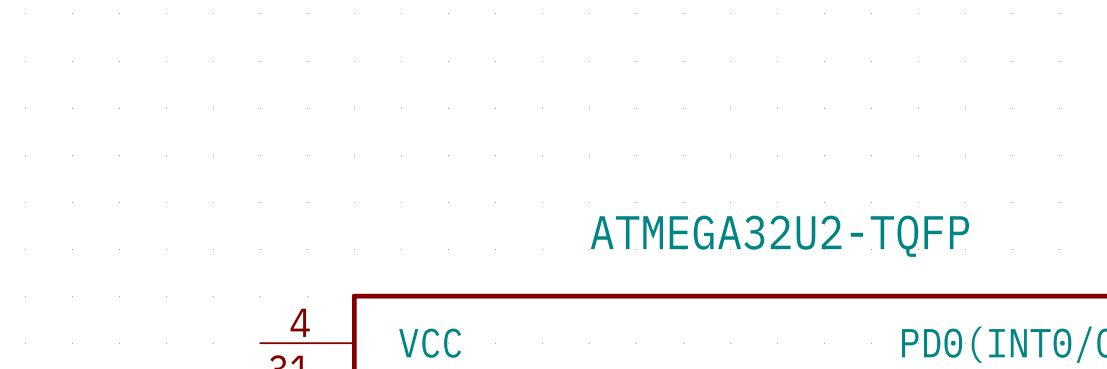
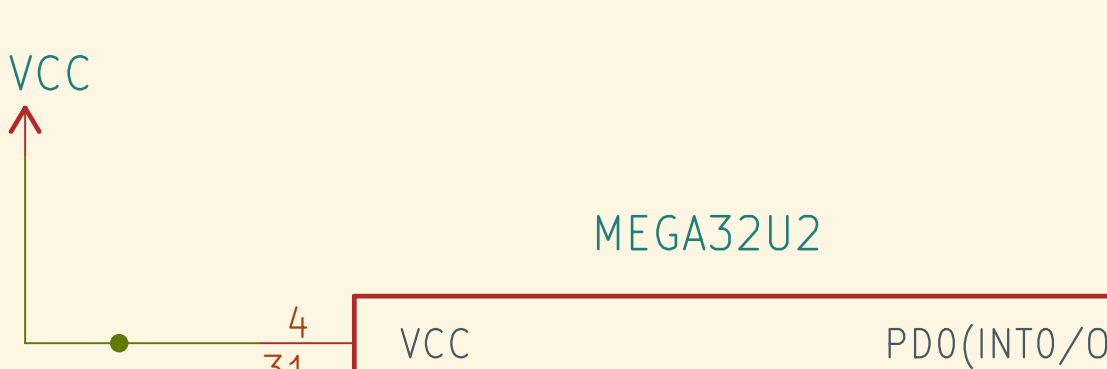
power symbol: none -> VCC (25, 130)
wire: none -> (25, 155) (25, 343) (260, 343)
part value: ATMEGA32U2-TQFP (779, 236) -> MEGA32U2 (707, 232)
junction: none -> (119, 343)

